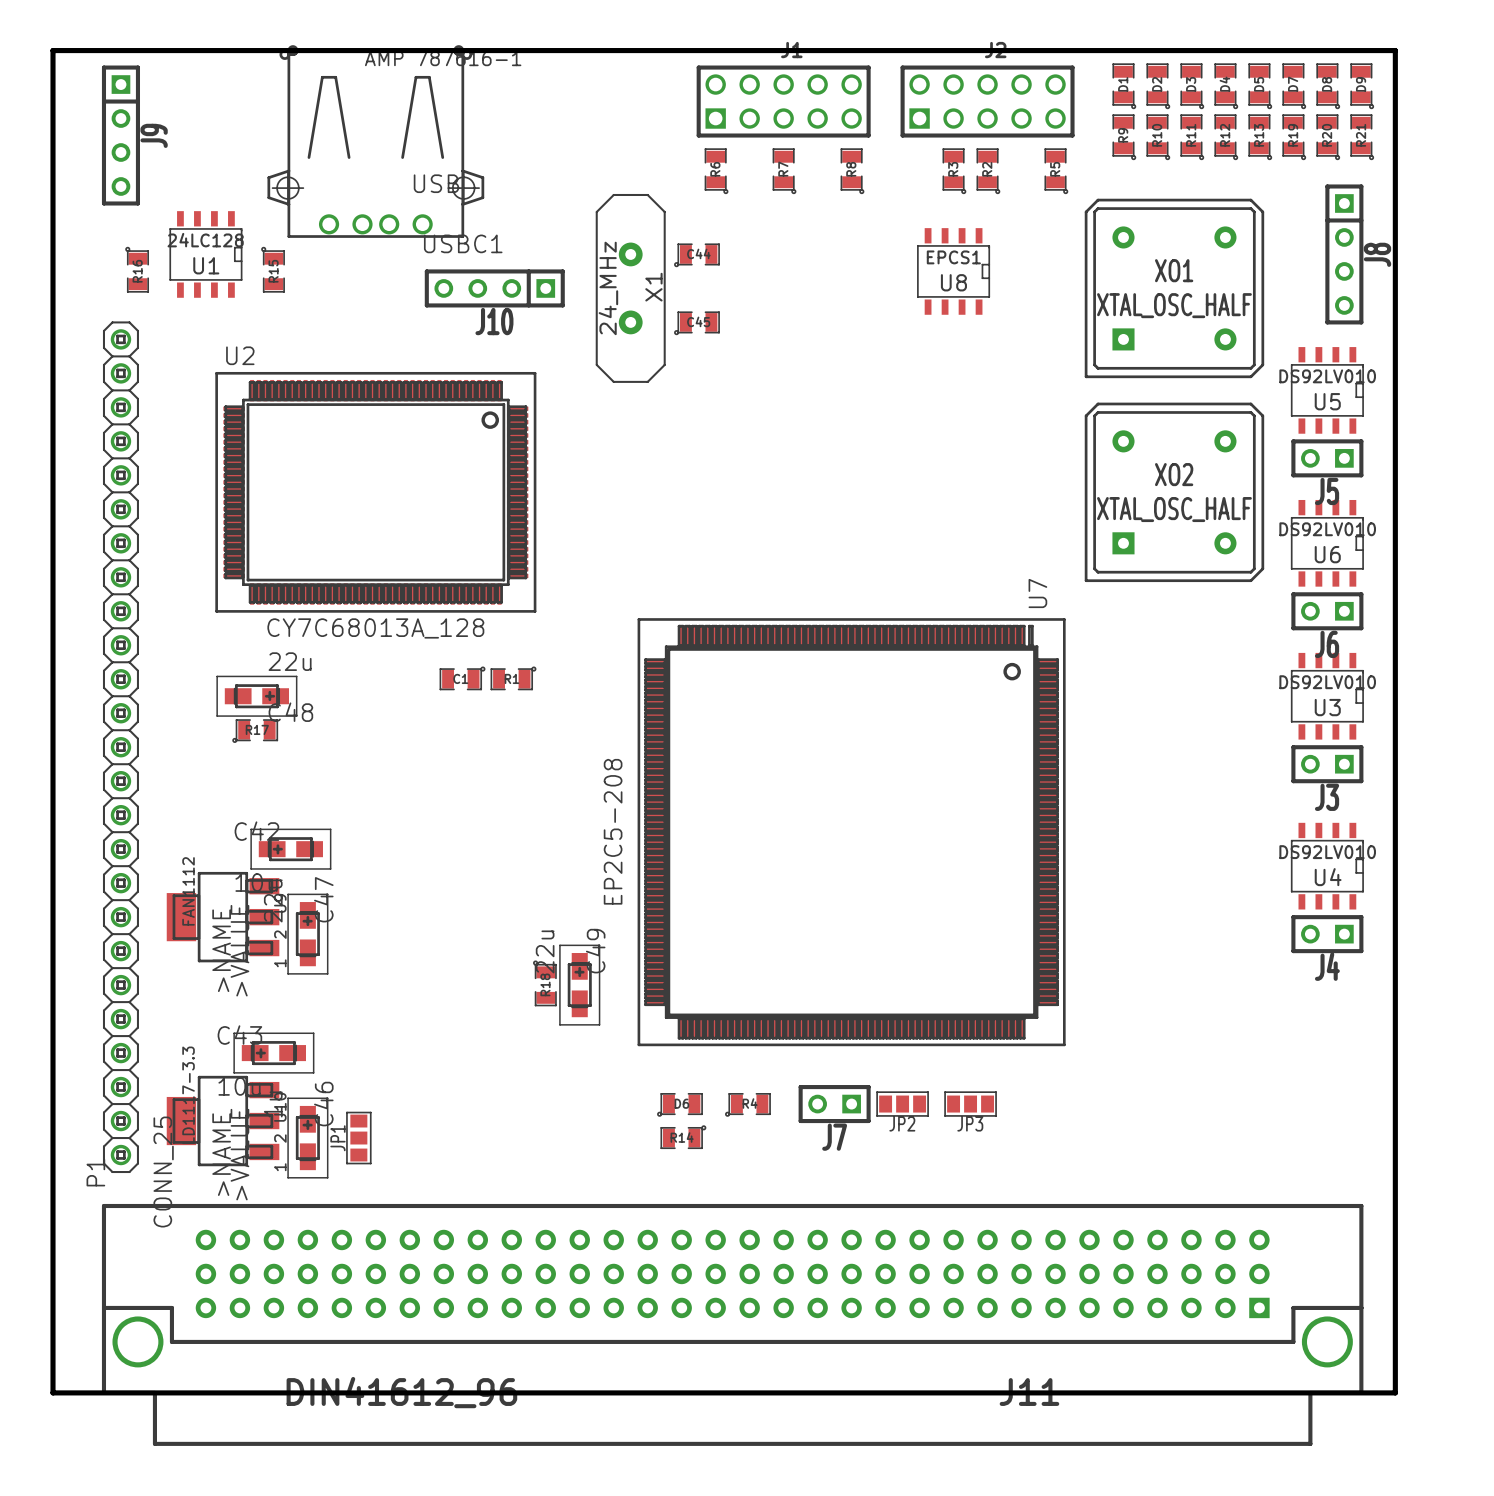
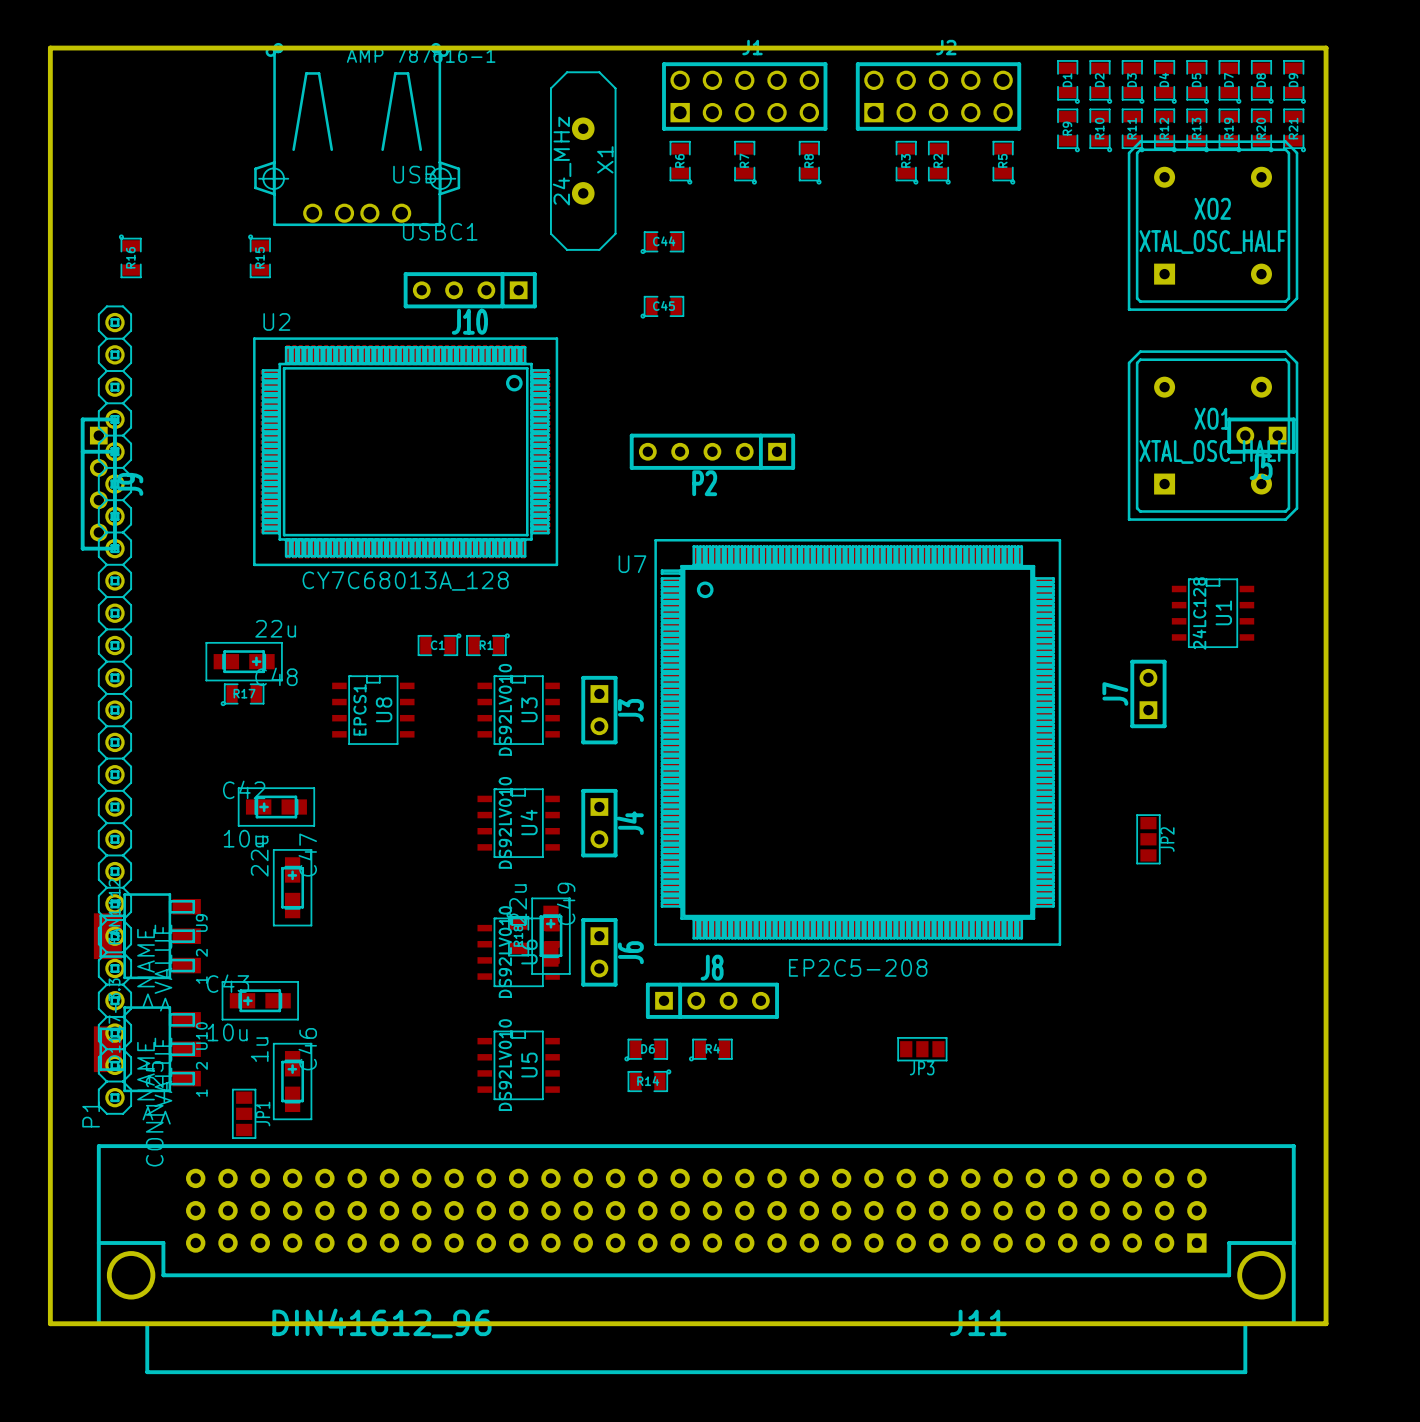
J9 position: (120, 135) -> (98, 484)
U1 rotation: 0° (205, 254) -> 90° counterclockwise (1213, 613)
U1 position: (205, 254) -> (1213, 613)
J8 rotation: 0° (1344, 254) -> 90° counterclockwise (712, 1000)
J8 position: (1344, 254) -> (712, 1000)
U8 rotation: 0° (953, 271) -> 90° counterclockwise (373, 710)
U8 position: (953, 271) -> (373, 710)
J10 position: (494, 288) -> (470, 290)
X1 position: (630, 288) -> (583, 161)
XO1 position: (1174, 288) -> (1213, 435)
U5 rotation: 0° (1327, 390) -> 90° counterclockwise (518, 1065)
U5 position: (1327, 390) -> (518, 1065)
P2: none -> (712, 451)
U2 position: (375, 492) -> (405, 451)
XO2 position: (1174, 492) -> (1213, 225)
U6 rotation: 0° (1327, 543) -> 90° counterclockwise (518, 952)
U6 position: (1327, 543) -> (518, 952)
J6 rotation: 0° (1327, 611) -> 90° counterclockwise (599, 952)
J6 position: (1327, 611) -> (599, 952)
U3 rotation: 0° (1327, 696) -> 90° counterclockwise (518, 710)
U3 position: (1327, 696) -> (518, 710)
J3 rotation: 0° (1327, 764) -> 90° counterclockwise (599, 710)
J3 position: (1327, 764) -> (599, 710)
U7 rotation: 0° (851, 832) -> 90° counterclockwise (857, 742)
U4 rotation: 0° (1327, 866) -> 90° counterclockwise (518, 823)
U4 position: (1327, 866) -> (518, 823)
U9 position: (223, 917) -> (147, 936)
J4 rotation: 0° (1327, 934) -> 90° counterclockwise (599, 823)
J4 position: (1327, 934) -> (599, 823)
J7 rotation: 0° (834, 1104) -> 90° clockwise (1148, 693)
J7 position: (834, 1104) -> (1148, 693)
JP2 rotation: 0° (902, 1104) -> 90° clockwise (1148, 839)
JP2 position: (902, 1104) -> (1148, 839)
U10 position: (223, 1121) -> (147, 1049)
JP2 name position: JP2 (902, 1123) -> JP2 (1167, 839)
JP1 name position: JP1 (337, 1138) -> JP1 (263, 1114)
JP1 position: (358, 1138) -> (244, 1113)

